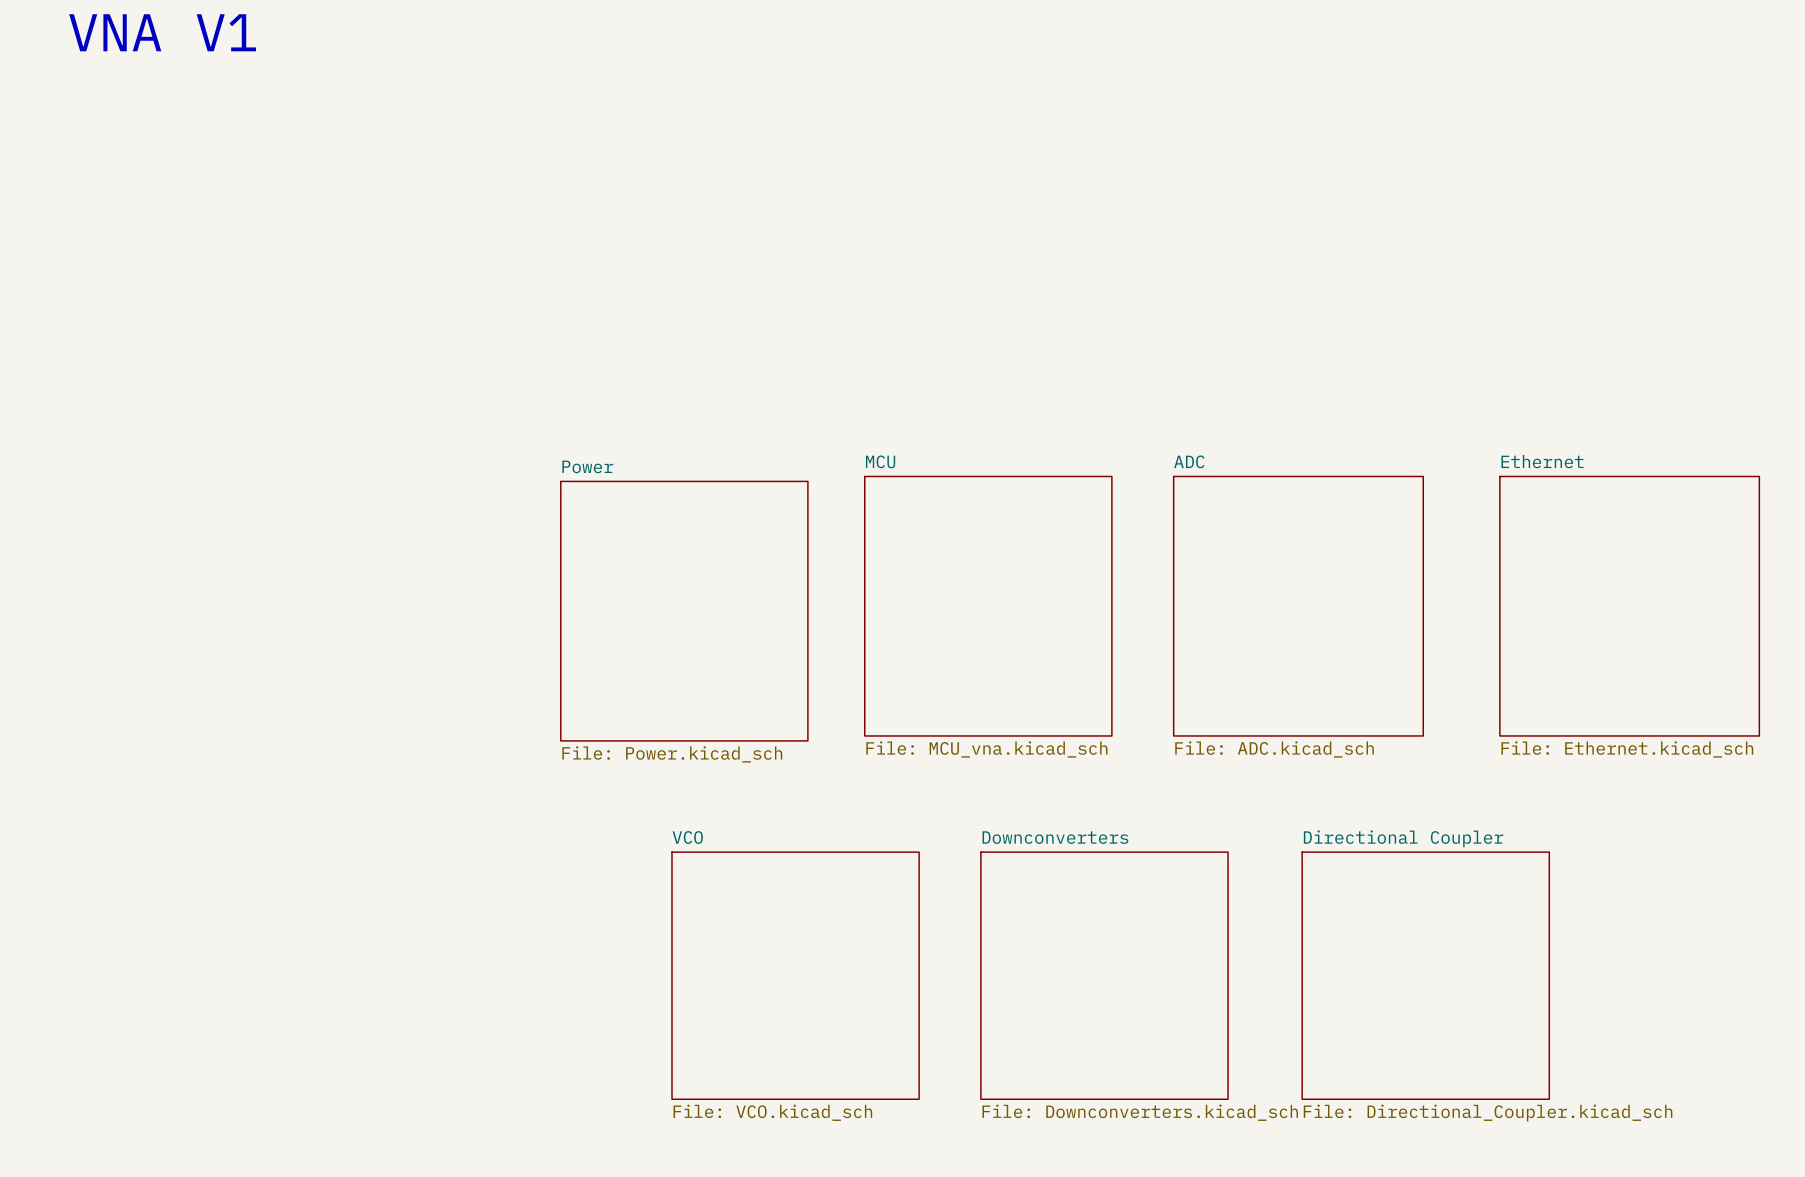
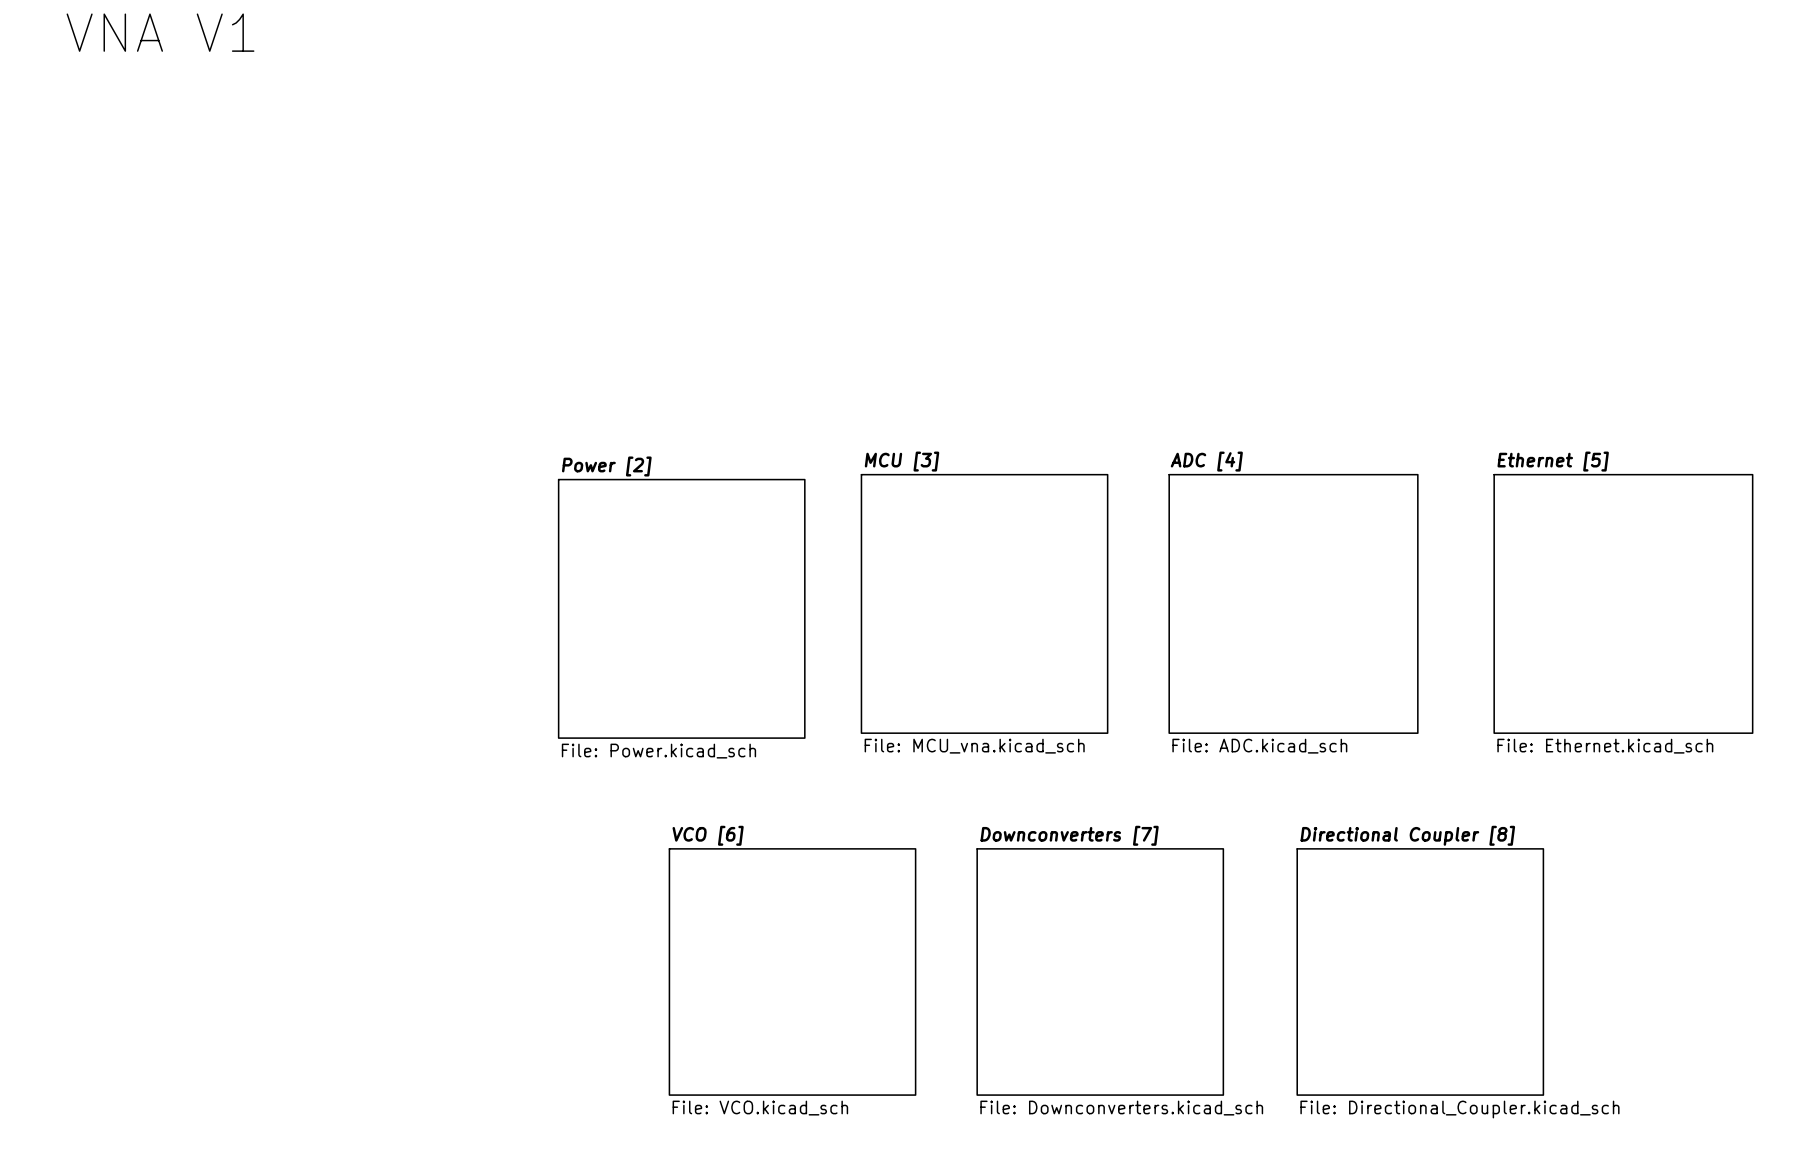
sheet MCU name: MCU (880, 461) -> MCU [3] (902, 461)
sheet ADC name: ADC (1189, 461) -> ADC [4] (1206, 461)
sheet Ethernet name: Ethernet (1542, 461) -> Ethernet [5] (1553, 461)
sheet Power name: Power (587, 466) -> Power [2] (606, 466)
sheet VCO name: VCO (687, 837) -> VCO [6] (708, 835)
sheet Downconverters name: Downconverters (1055, 837) -> Downconverters [7] (1069, 835)
sheet Directional Coupler name: Directional Coupler (1403, 838) -> Directional Coupler [8] (1407, 835)

